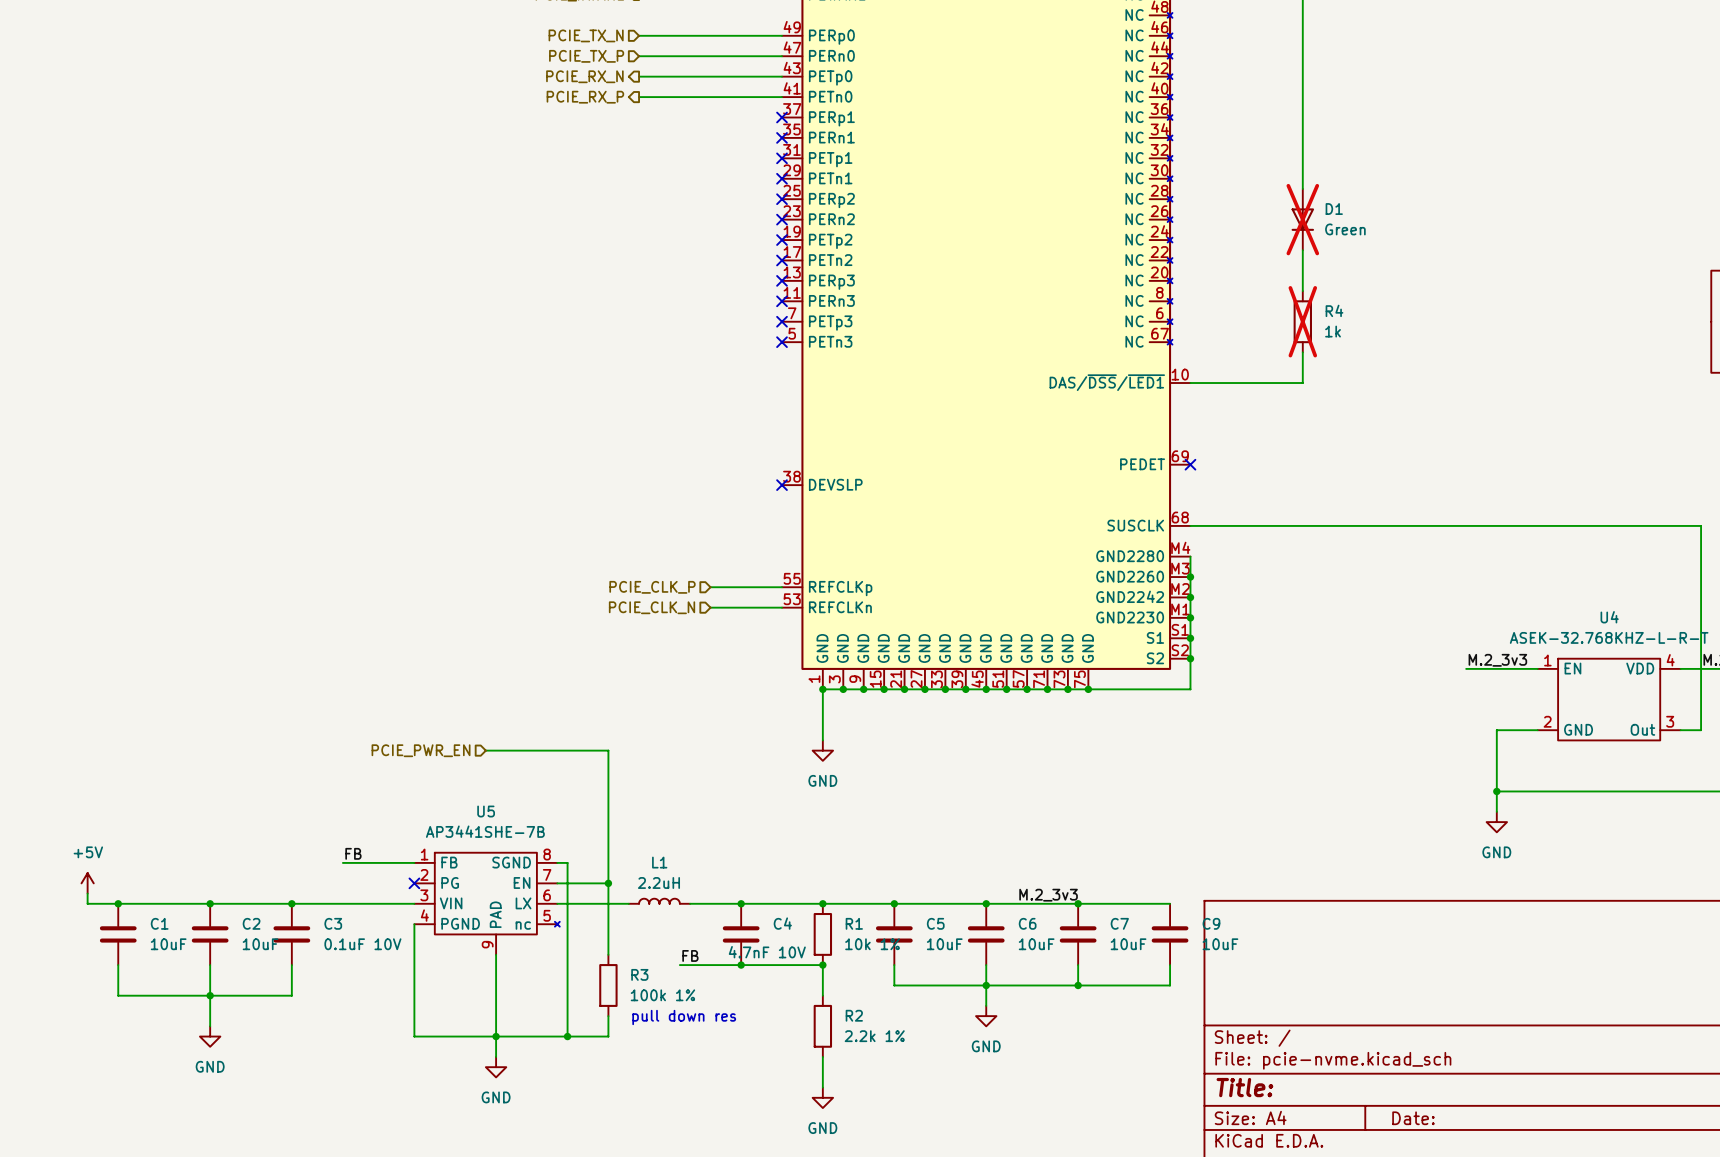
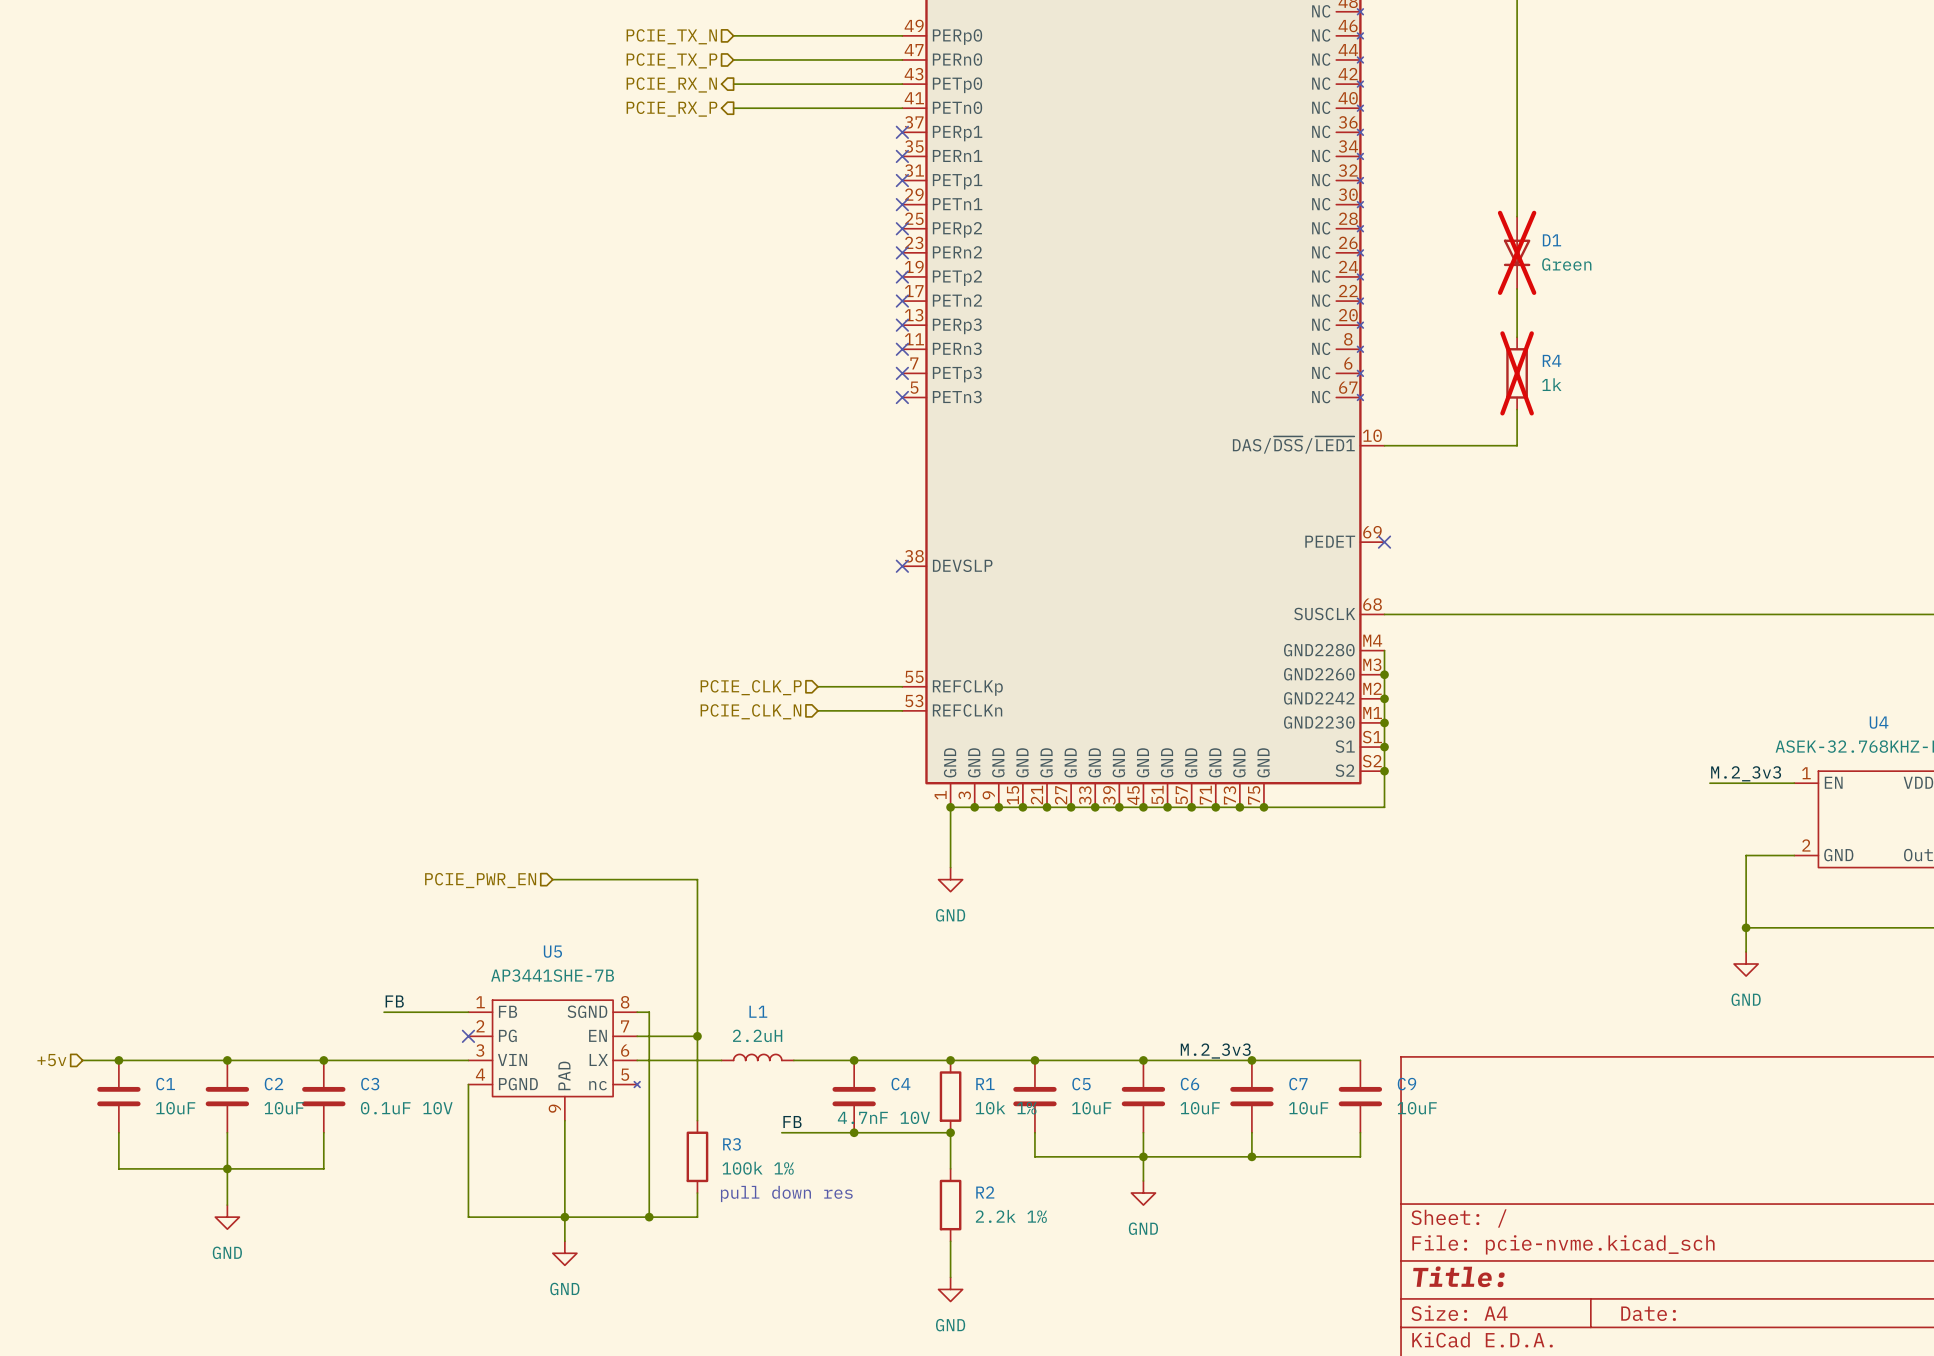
power symbol: +5V (87, 883) -> none
wire: (87, 893) (87, 903) -> none
hierarchical label: none -> +5v (51, 1060)

